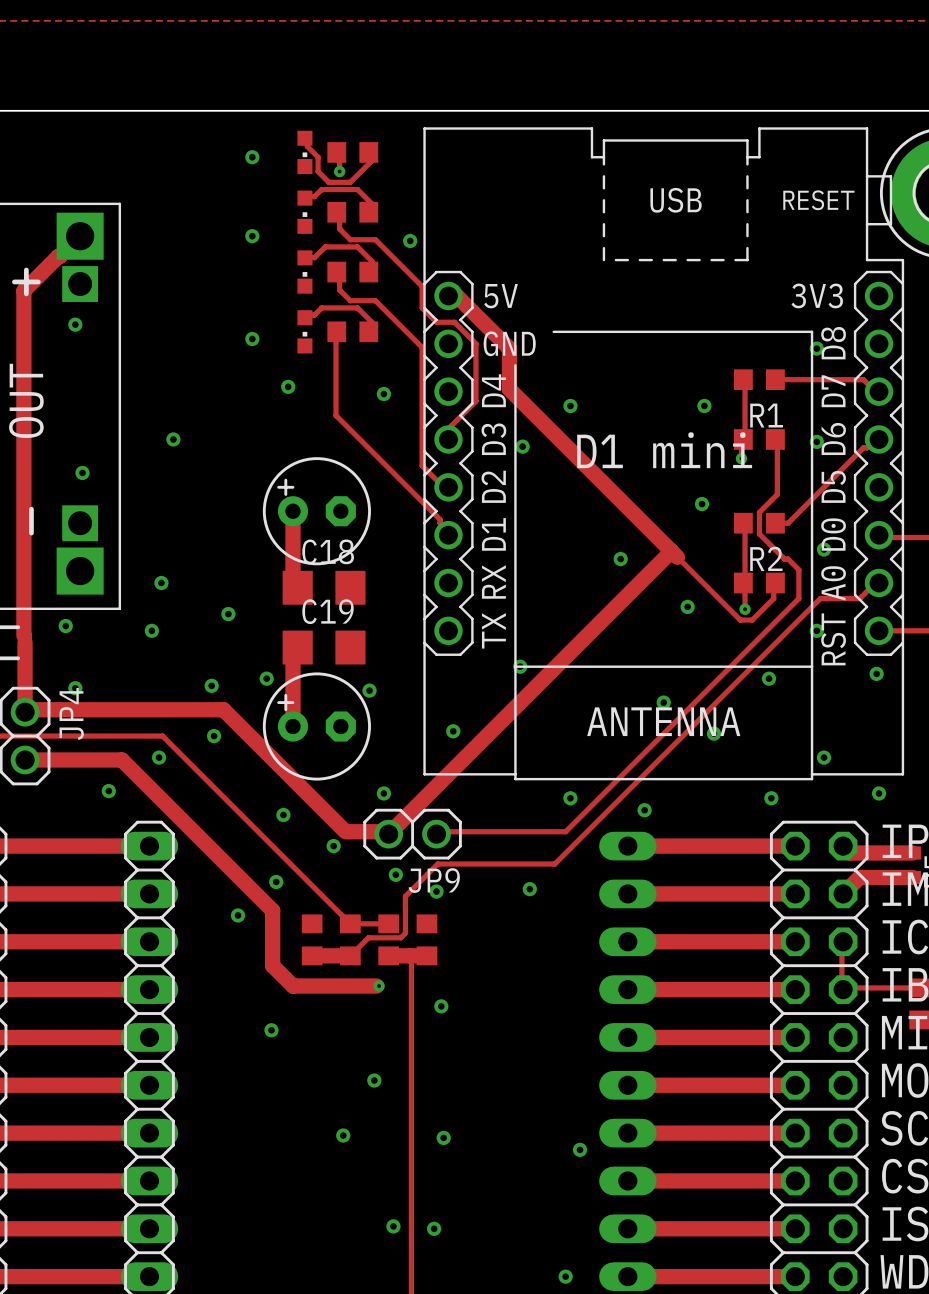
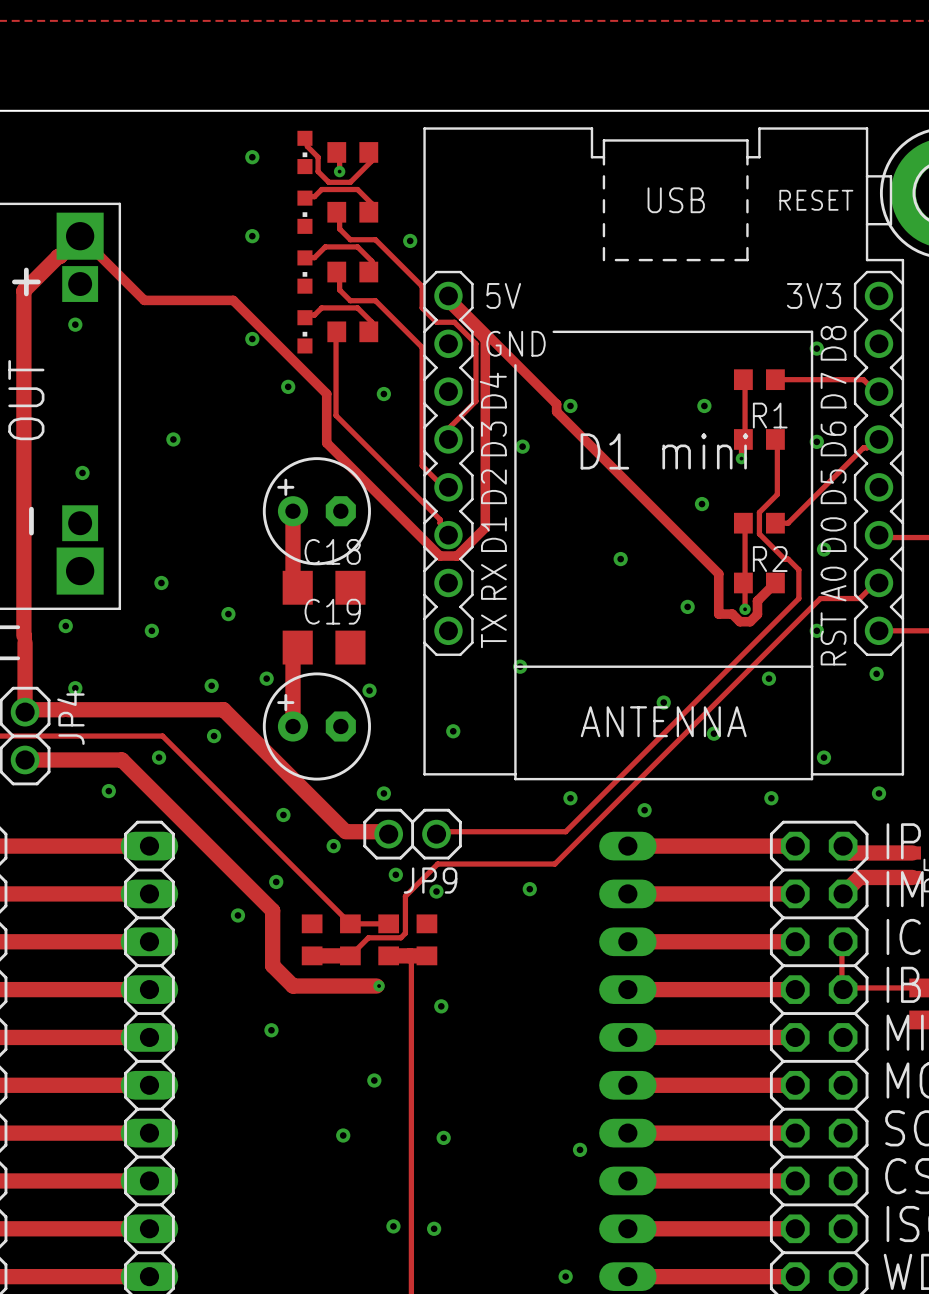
track: (448, 295) (456, 295) (509, 348) (509, 389) -> none
track: (509, 389) (740, 620) (752, 620) (773, 598) (773, 584) (775, 582) -> (80, 236) (144, 300) (233, 300) (326, 393) (326, 442) (439, 556) (457, 556) (485, 527) (485, 339) (448, 303) (448, 295) (556, 404) (556, 411) (718, 573) (718, 614) (732, 614) (739, 621) (750, 621) (757, 614) (757, 600) (775, 582)
track: (671, 551) (388, 834) -> none

